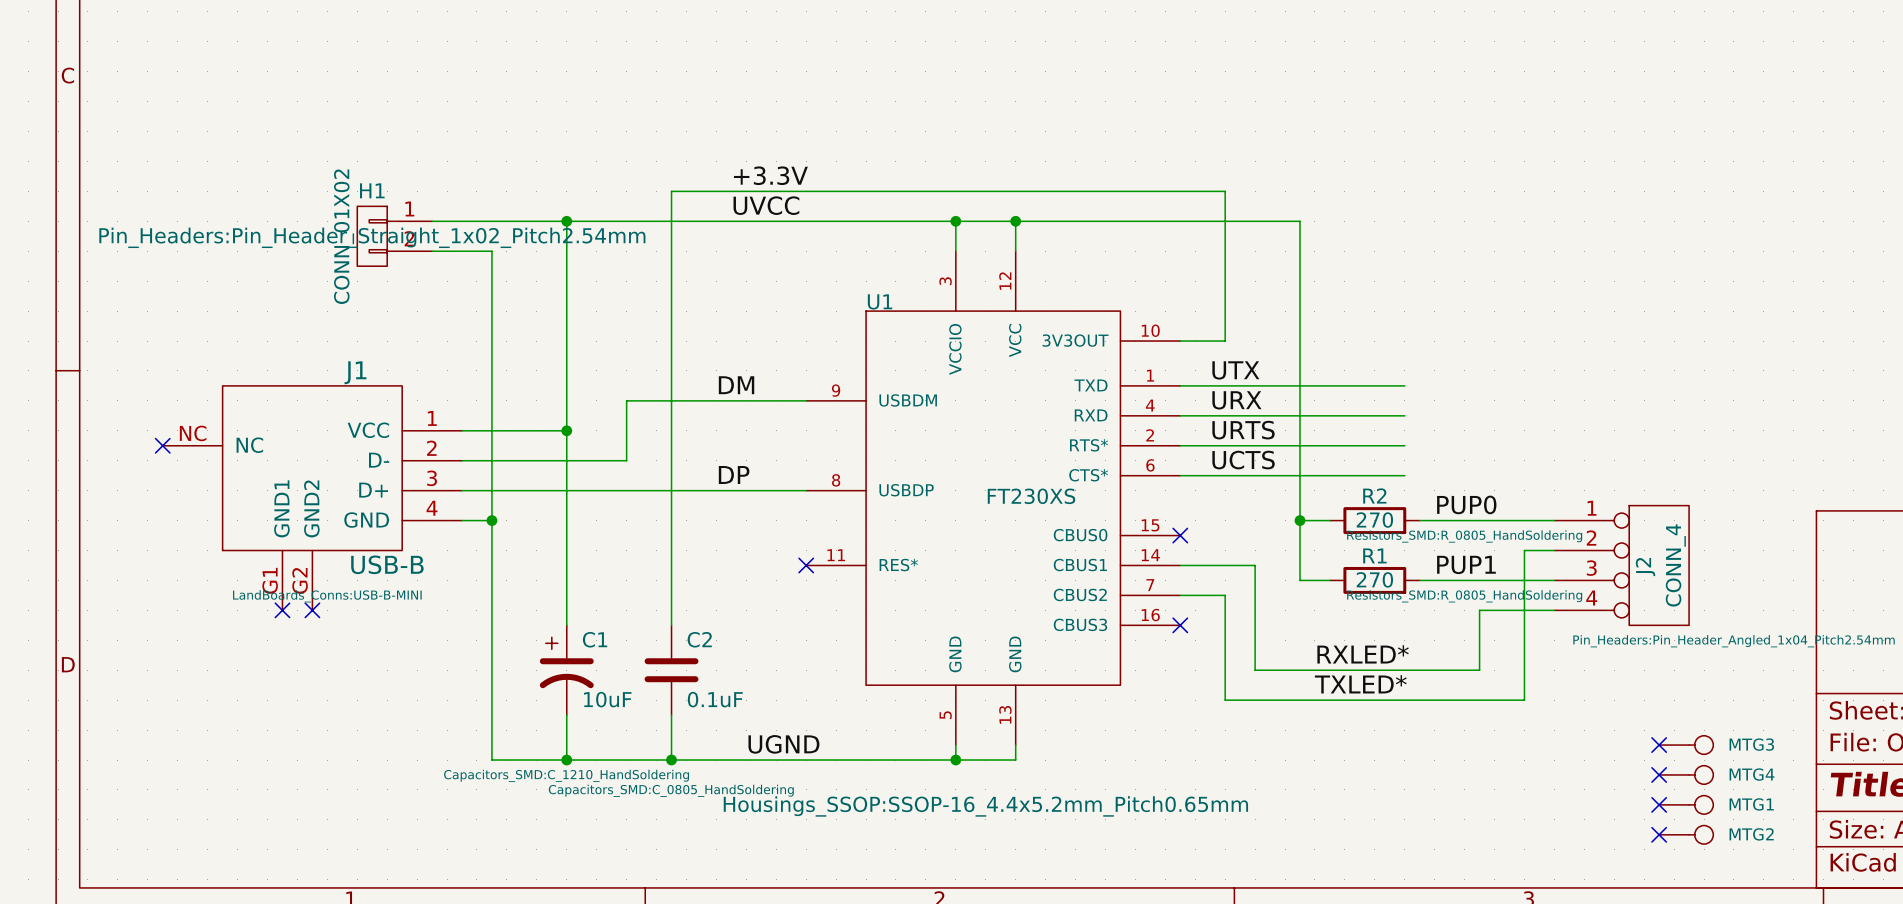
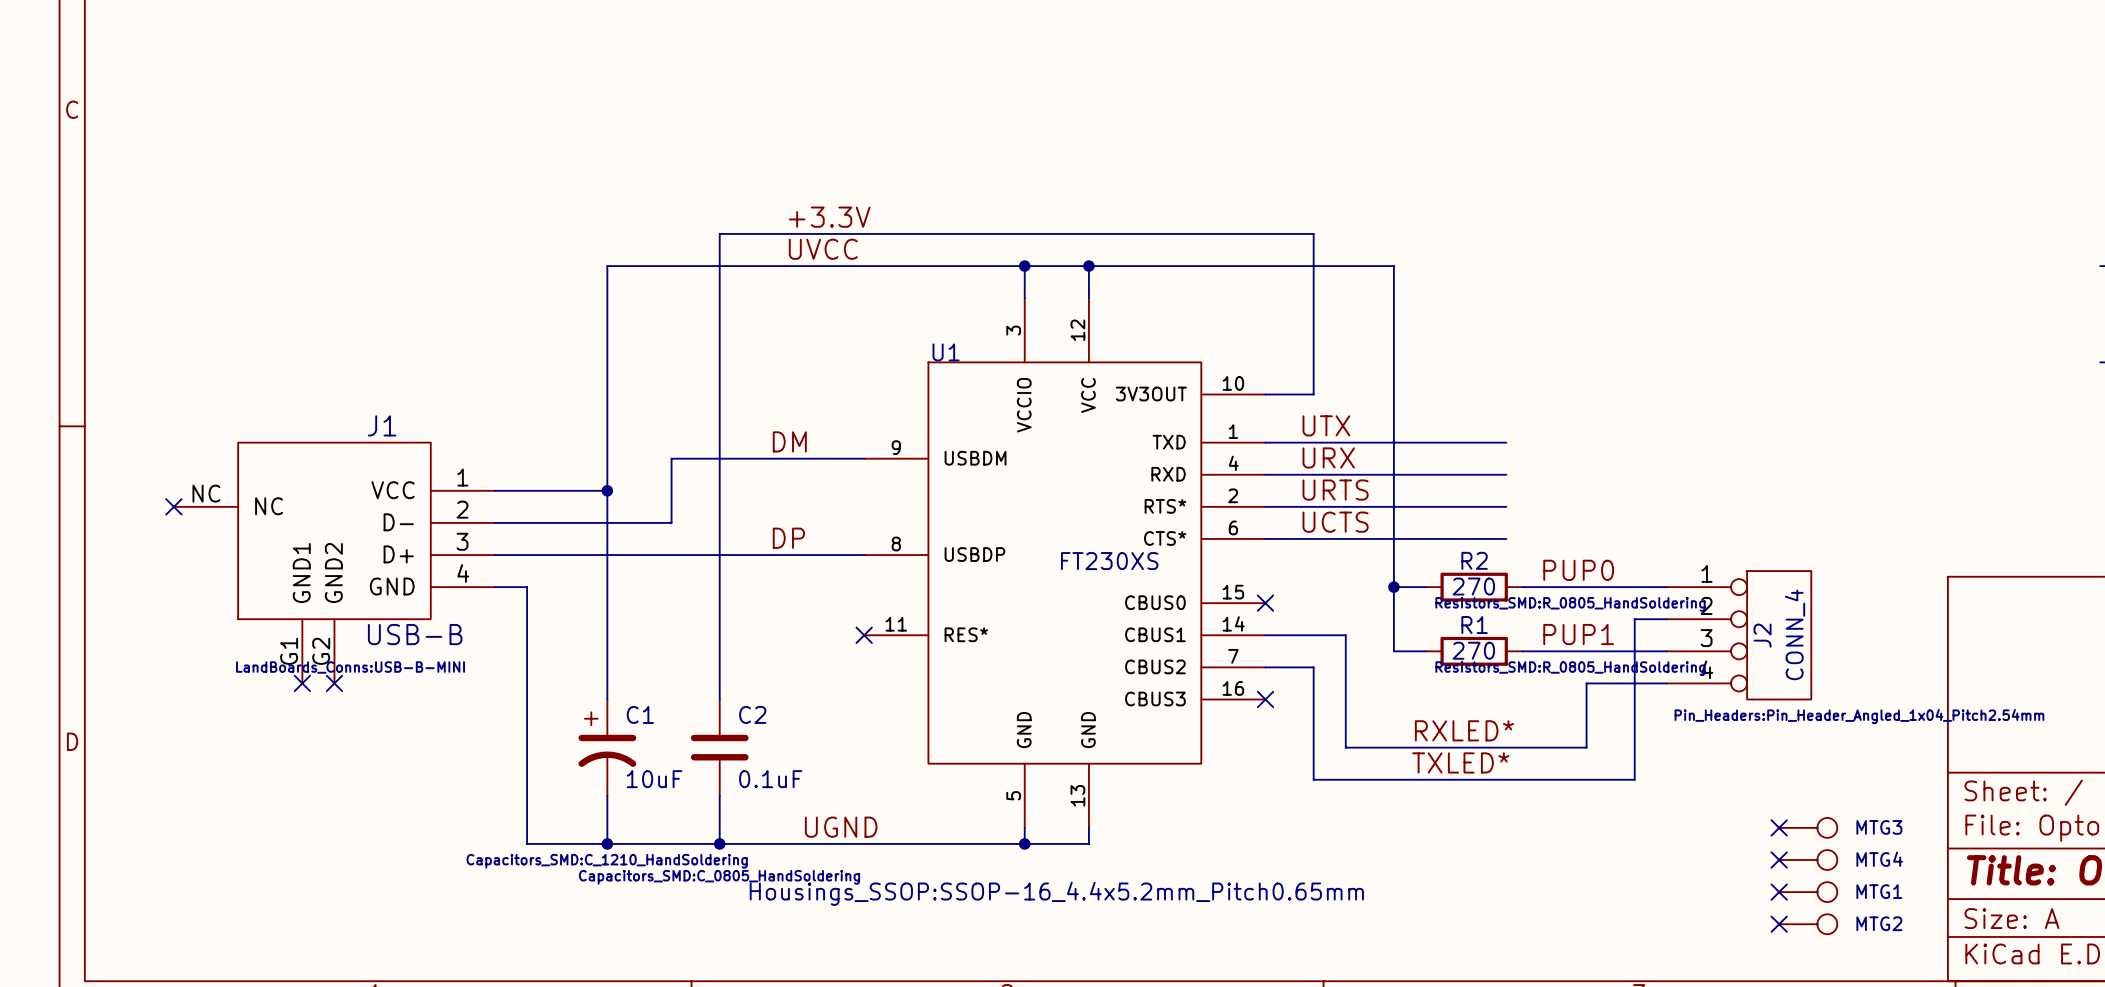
wire: (432, 221) (566, 221) -> none
junction: (566, 221) -> none
H1: CONN_01X02 (394, 236) -> none
wire: (432, 251) (491, 251) (491, 520) -> none
junction: (491, 520) -> none

